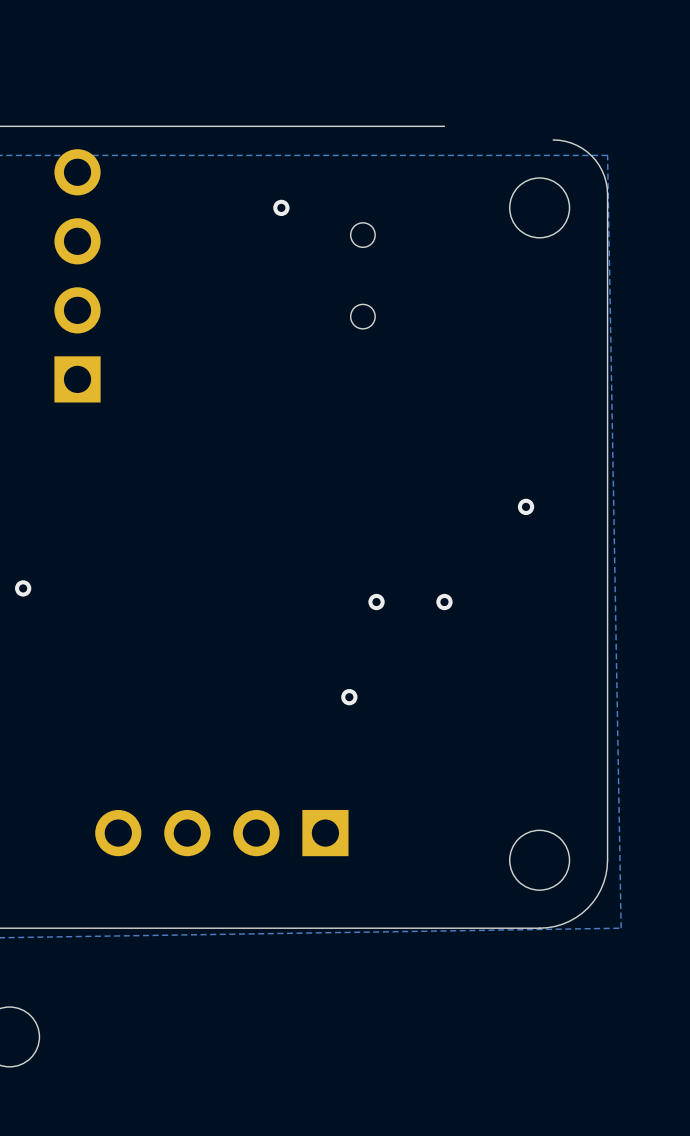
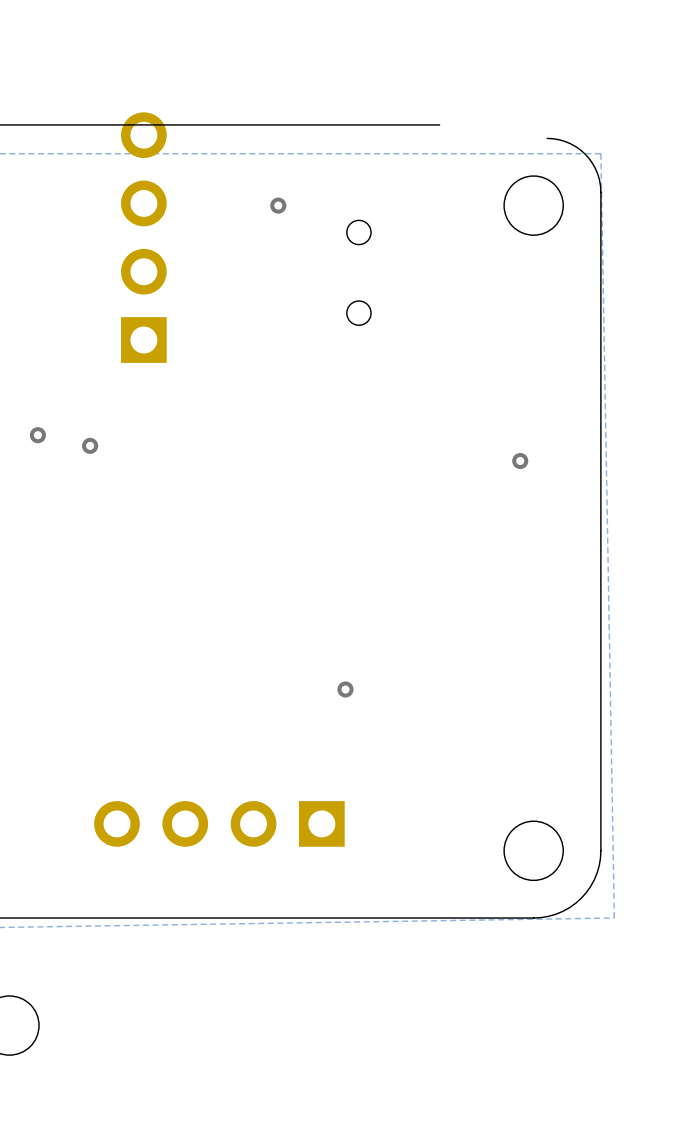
part: none -> (143, 237)
part: (77, 275) -> none
via: none -> (37, 435)
via: none -> (90, 445)
via position: (526, 506) -> (520, 461)
via: (23, 588) -> none
via: (376, 602) -> none
via: (444, 602) -> none

